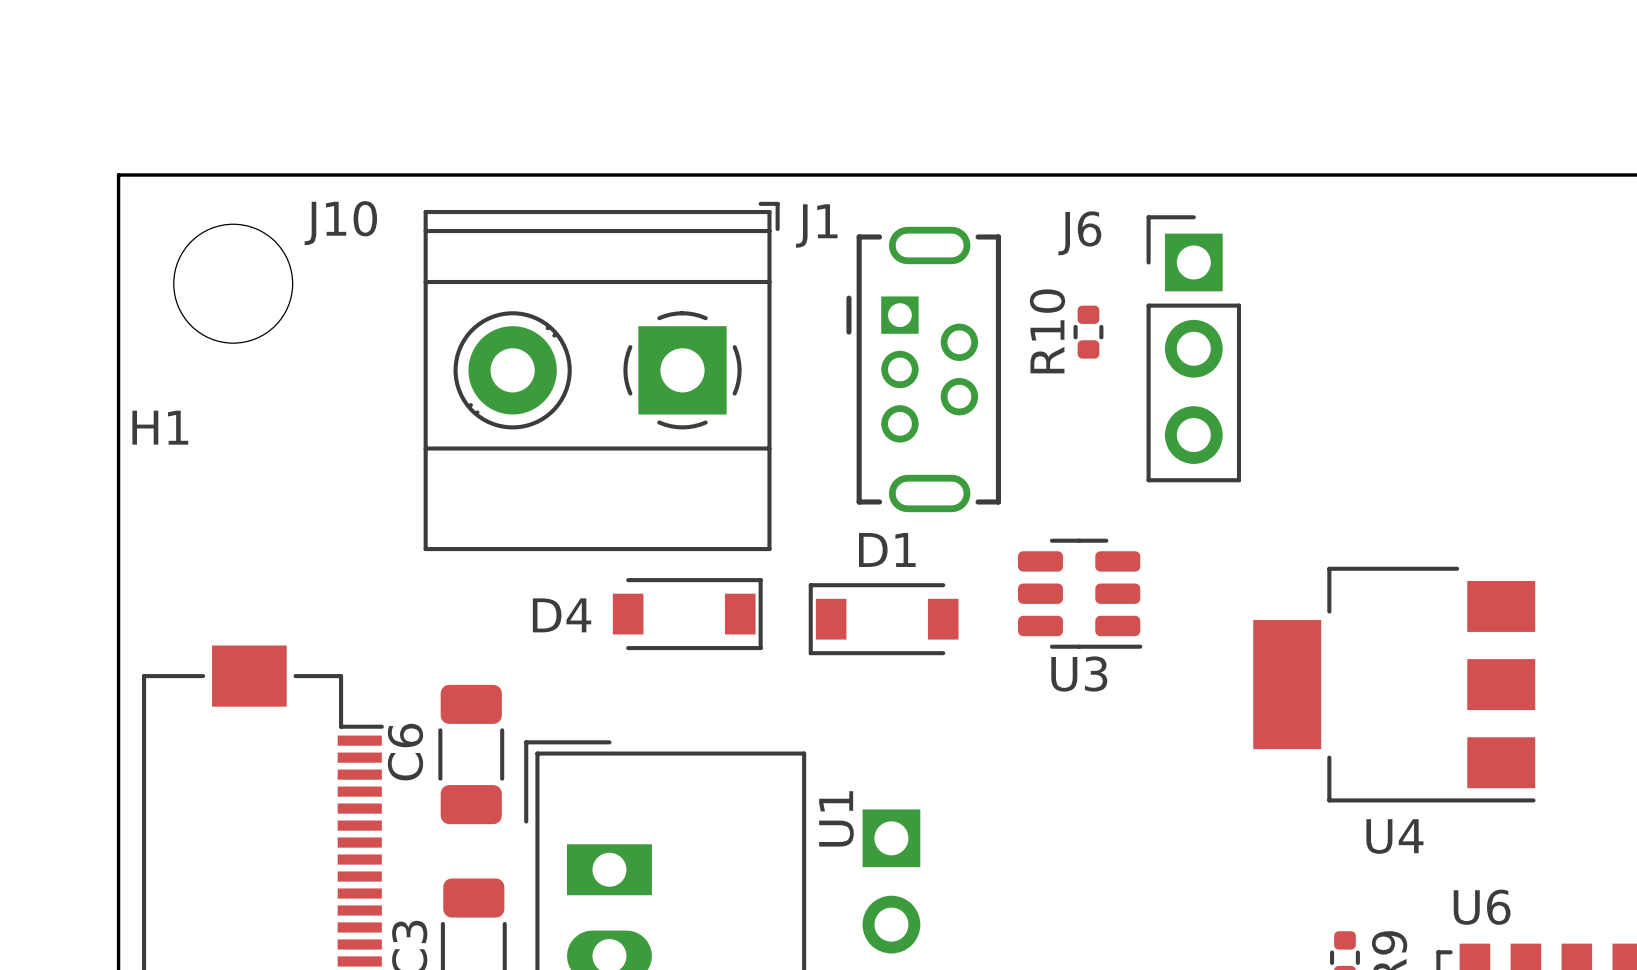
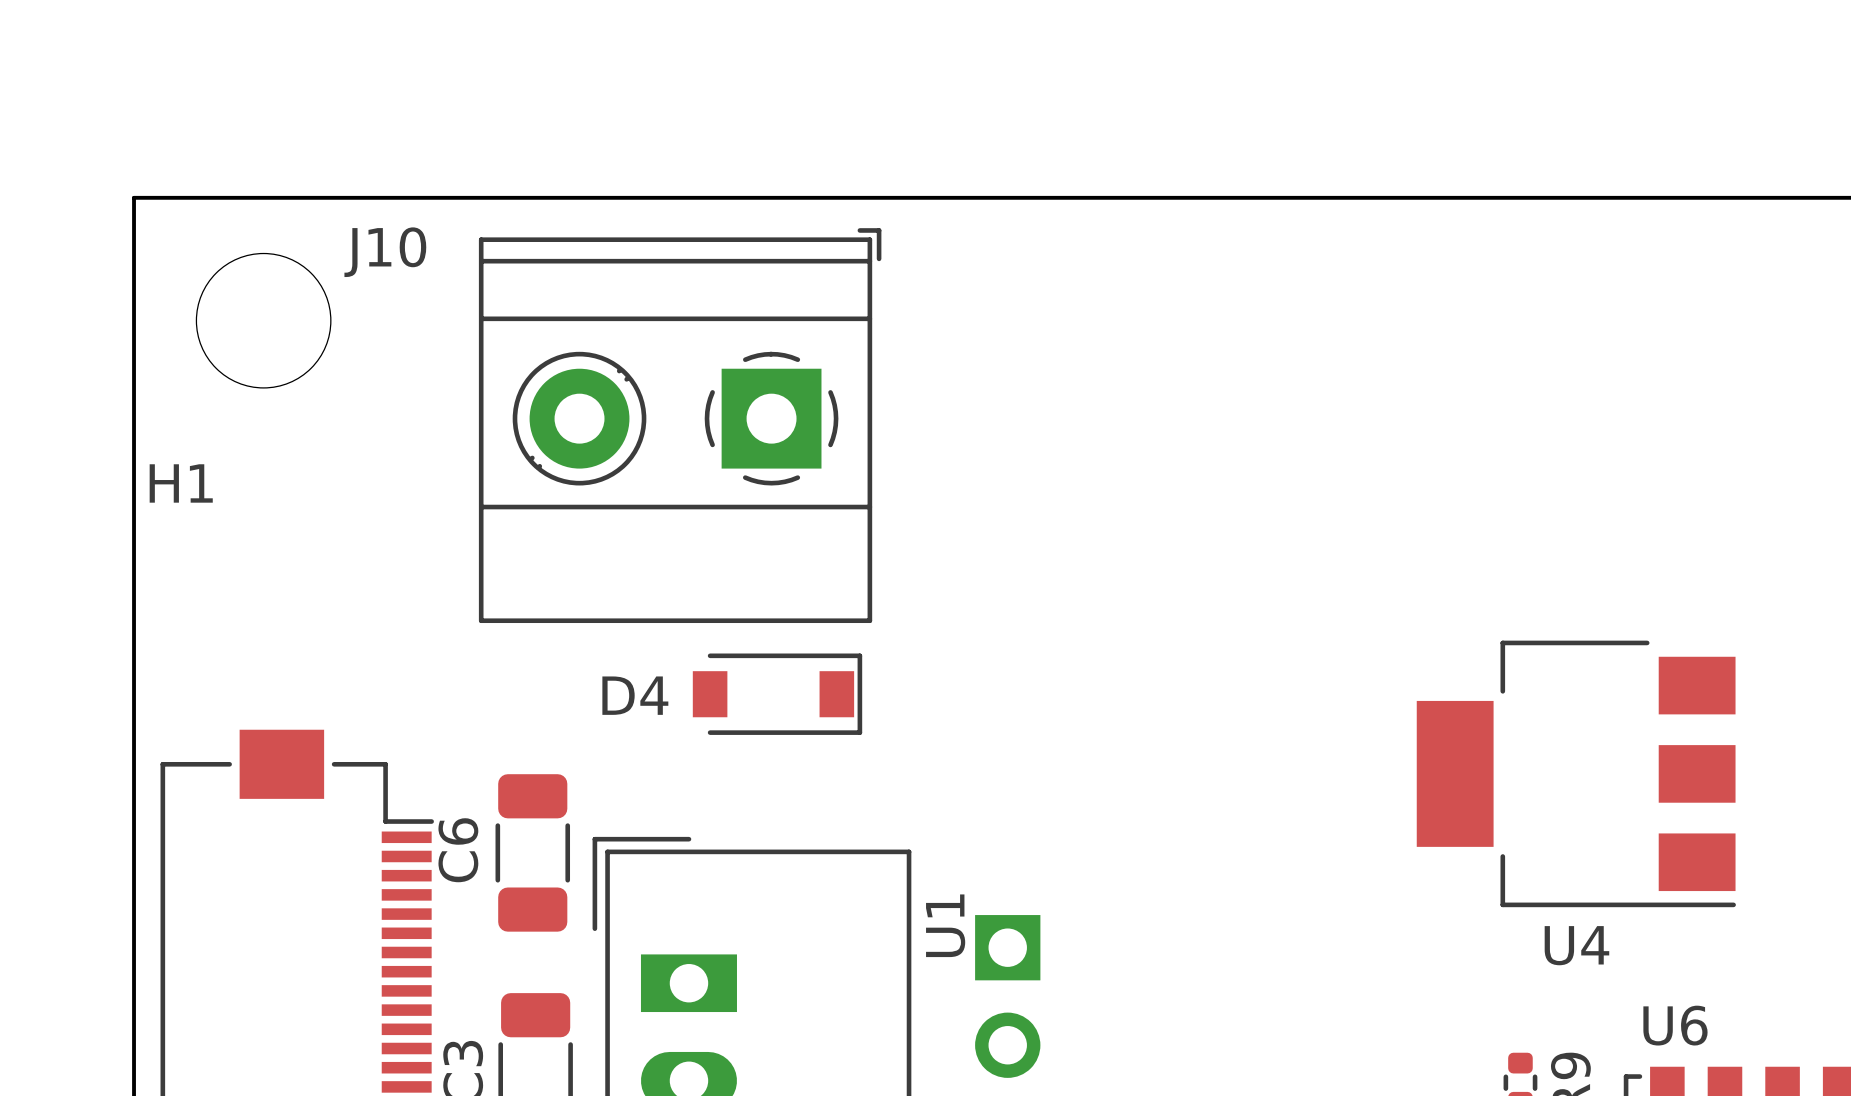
R10: (1088, 332) -> none
J6: (1193, 348) -> none
J1: (923, 369) -> none
U3: (1080, 593) -> none
D1: (883, 619) -> none

